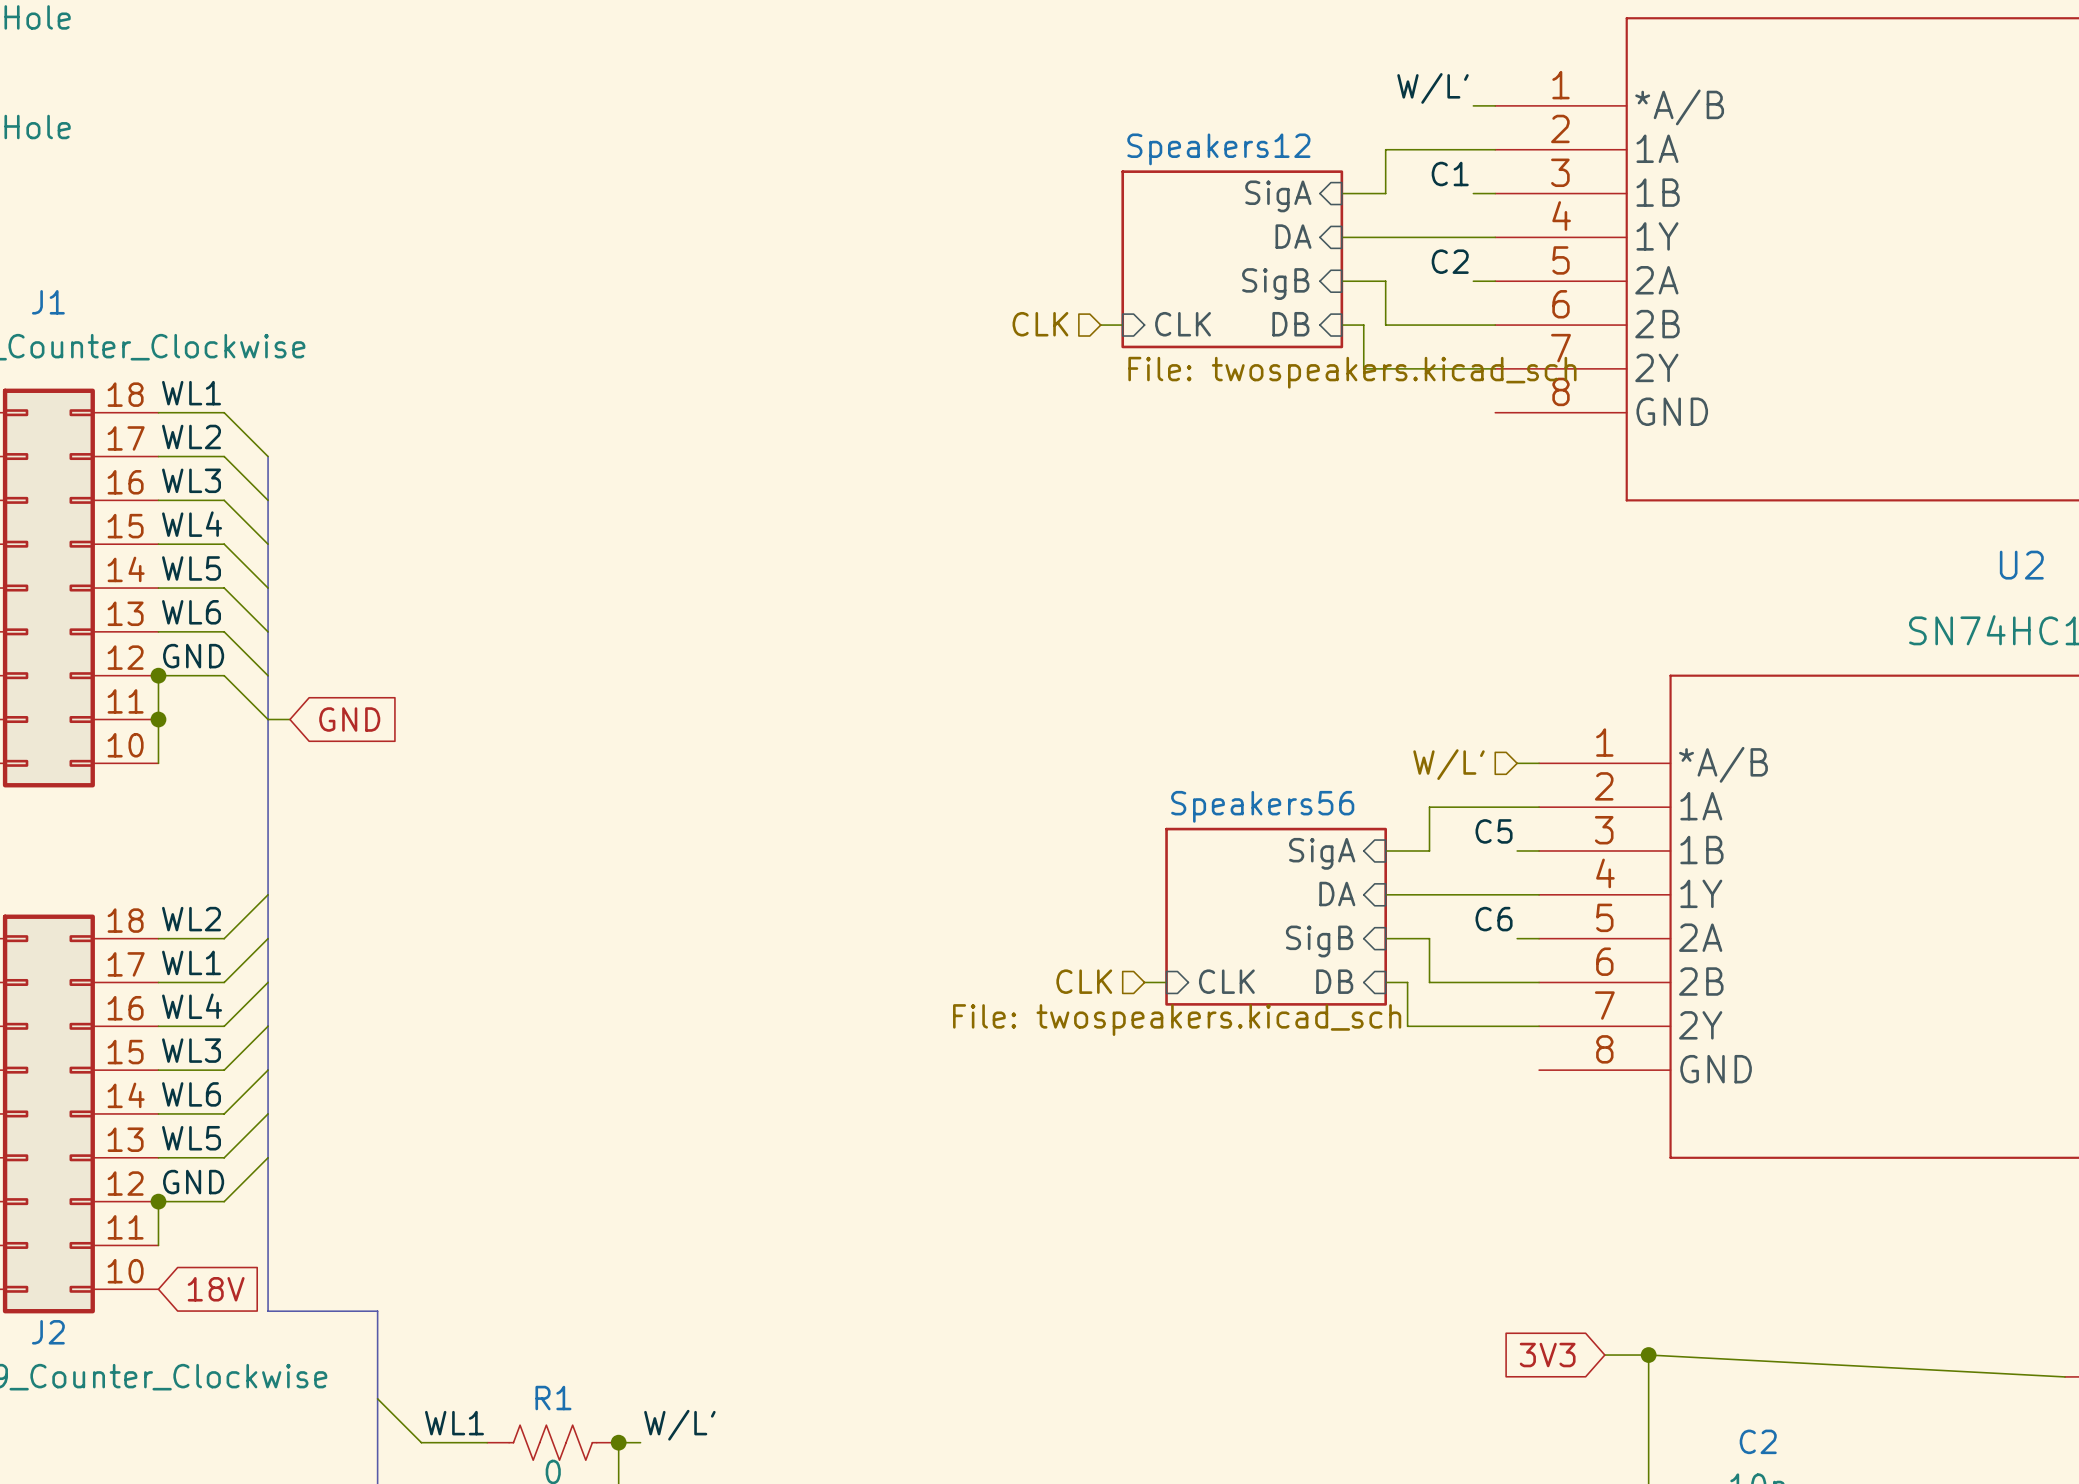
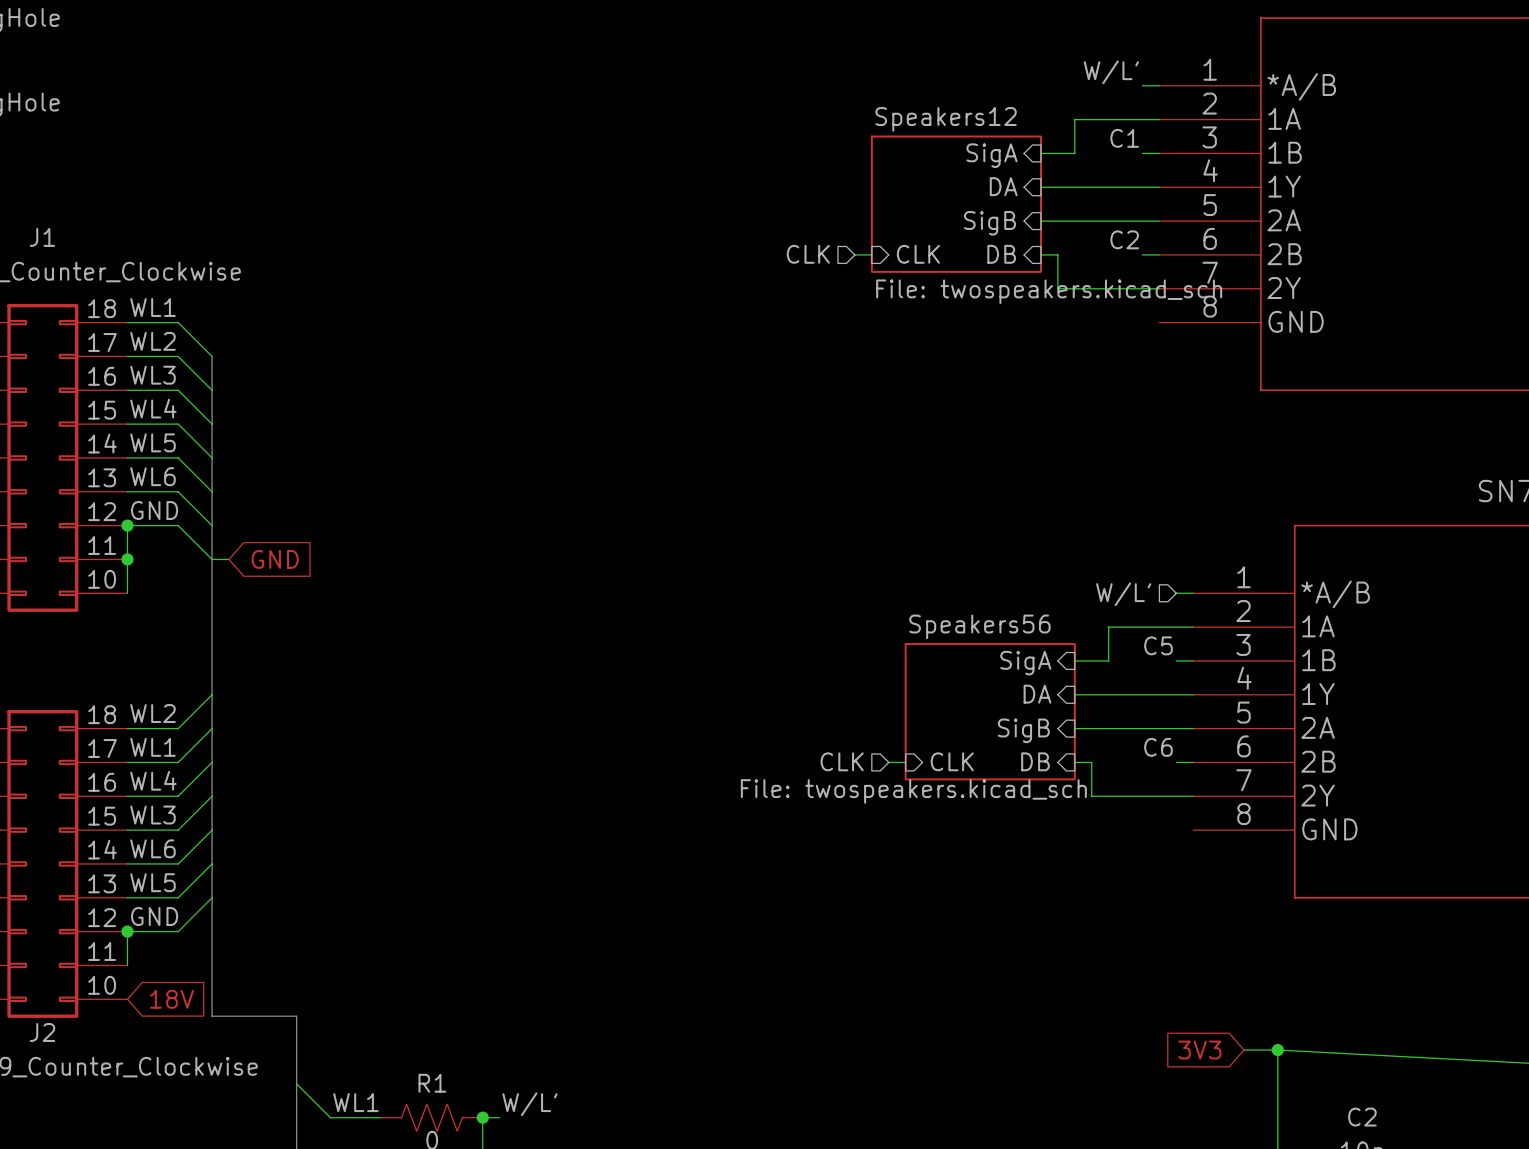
label position: C2 (1450, 261) -> C2 (1124, 239)
wire: (1385, 281) (1385, 325) (1473, 325) -> (1074, 221) (1142, 221)
label position: C6 (1494, 919) -> C6 (1158, 747)
wire: (1429, 938) (1429, 982) (1517, 982) -> (1108, 728) (1176, 728)

